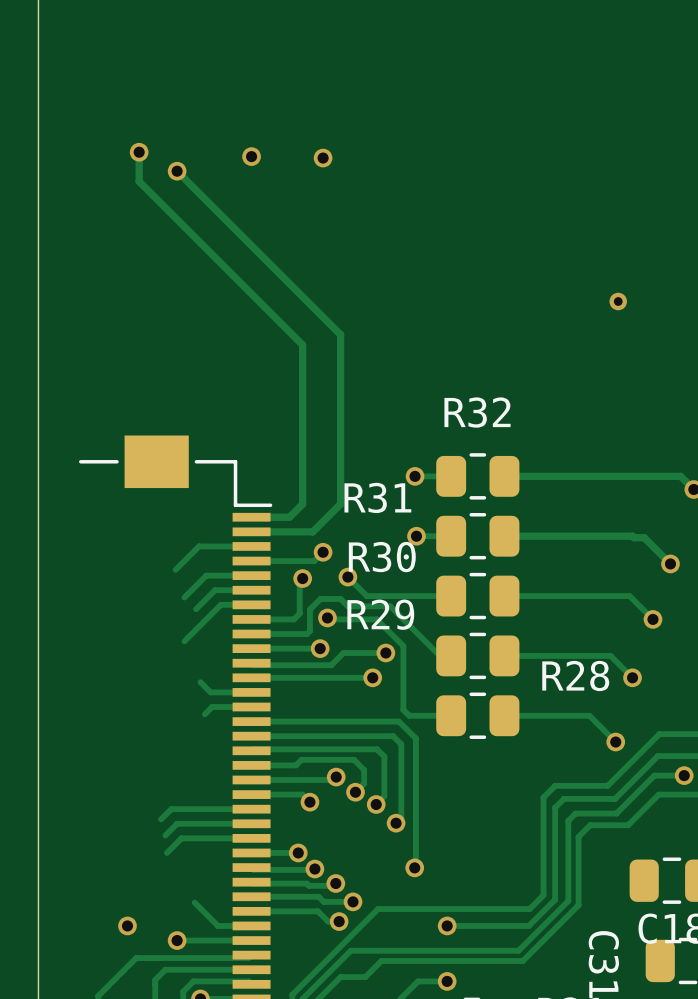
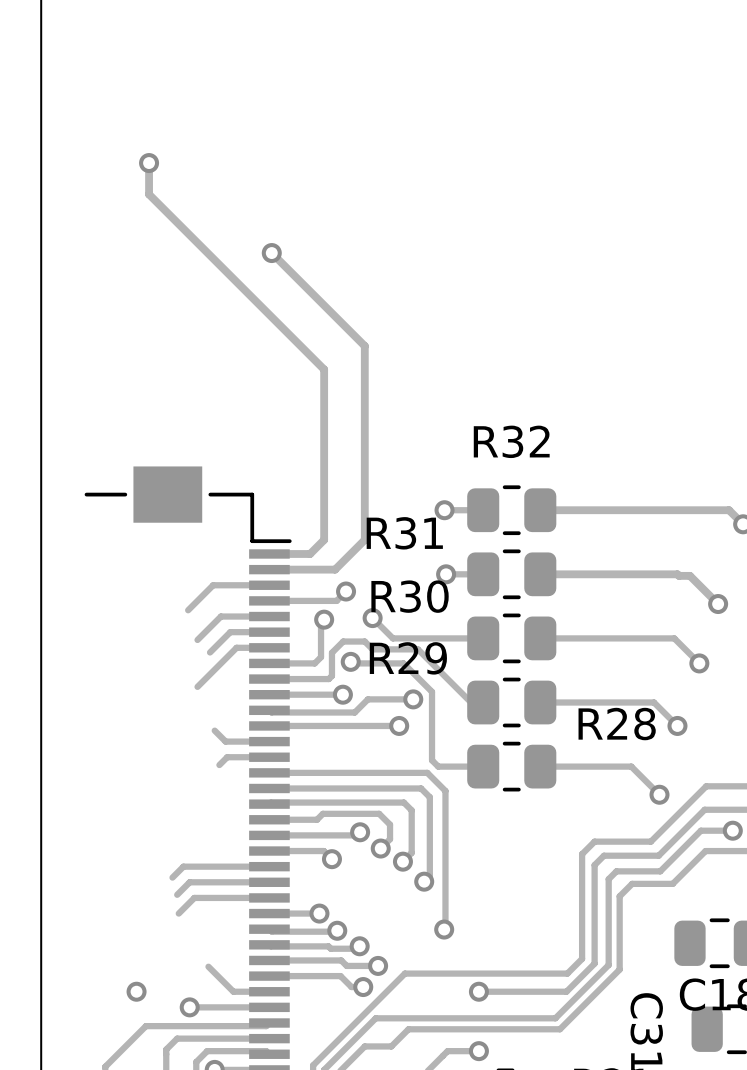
via: (251, 156) -> none
via: (323, 158) -> none
via: (177, 171) -> none
track: (174, 174) (177, 171) (340, 334) -> (271, 253) (364, 346) (364, 358)
via: none -> (271, 253)
via: (618, 301) -> none

